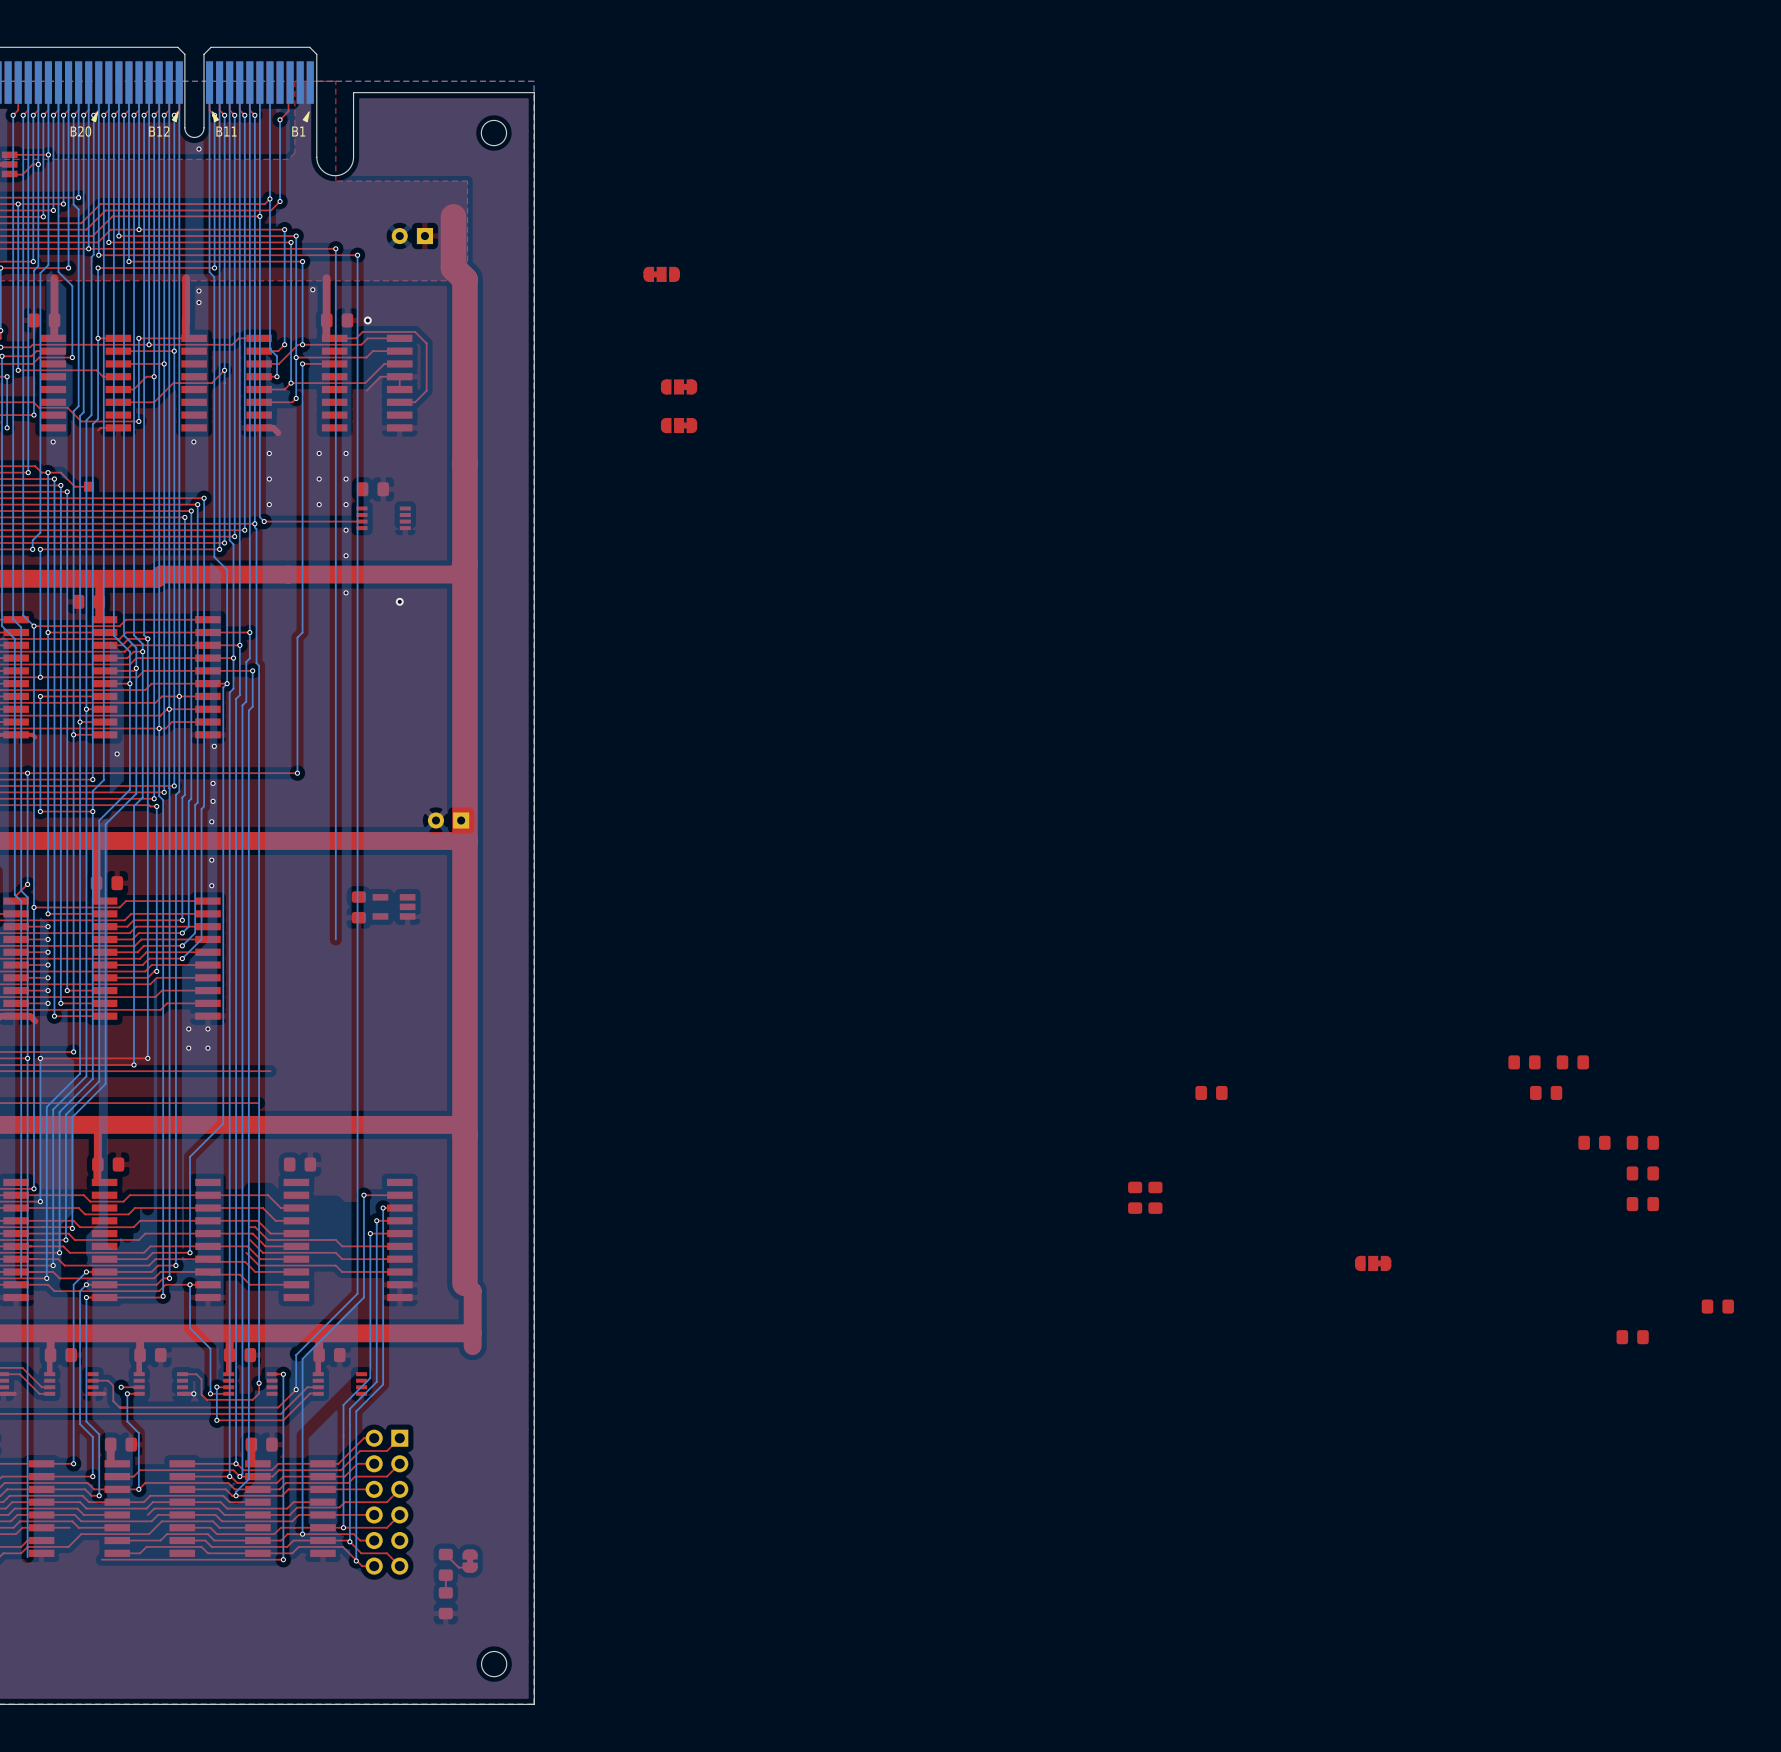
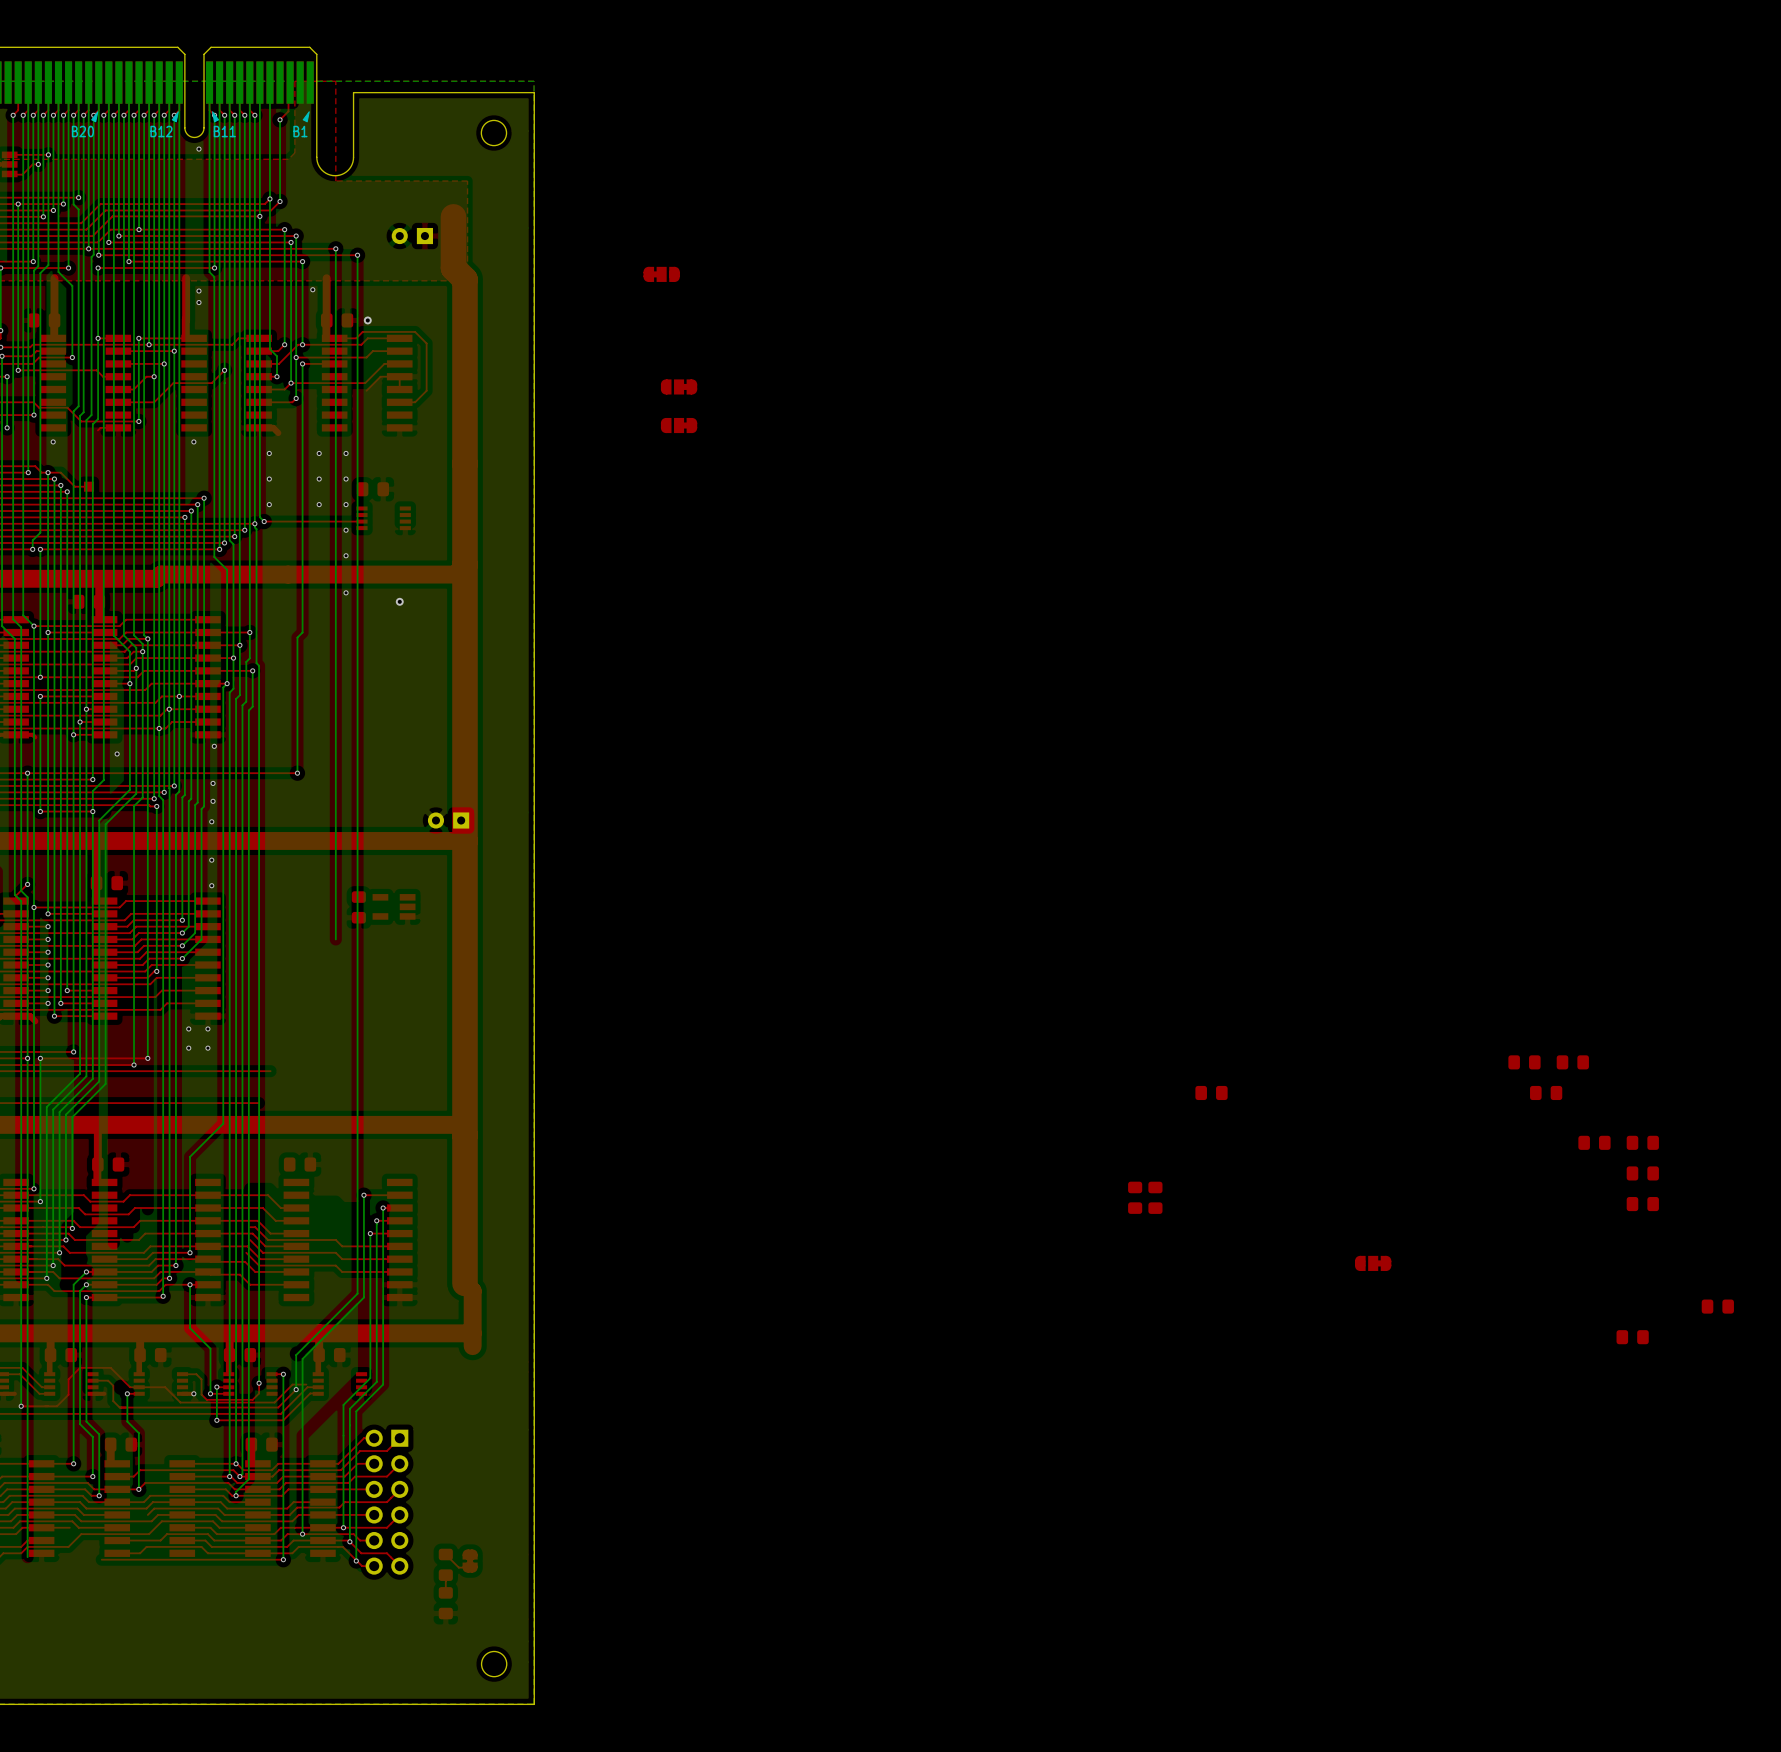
bottom track: none -> (21, 1277) (21, 1406)
top track: none -> (306, 1384) (292, 1384) (274, 1402) (180, 1402) (165, 1387) (139, 1387)
via: (121, 1387) -> none
top track: (130, 1387) (121, 1387) -> (130, 1387) (110, 1367) (80, 1367) (68, 1379) (68, 1394) (57, 1406) (21, 1406)
via: none -> (21, 1406)

